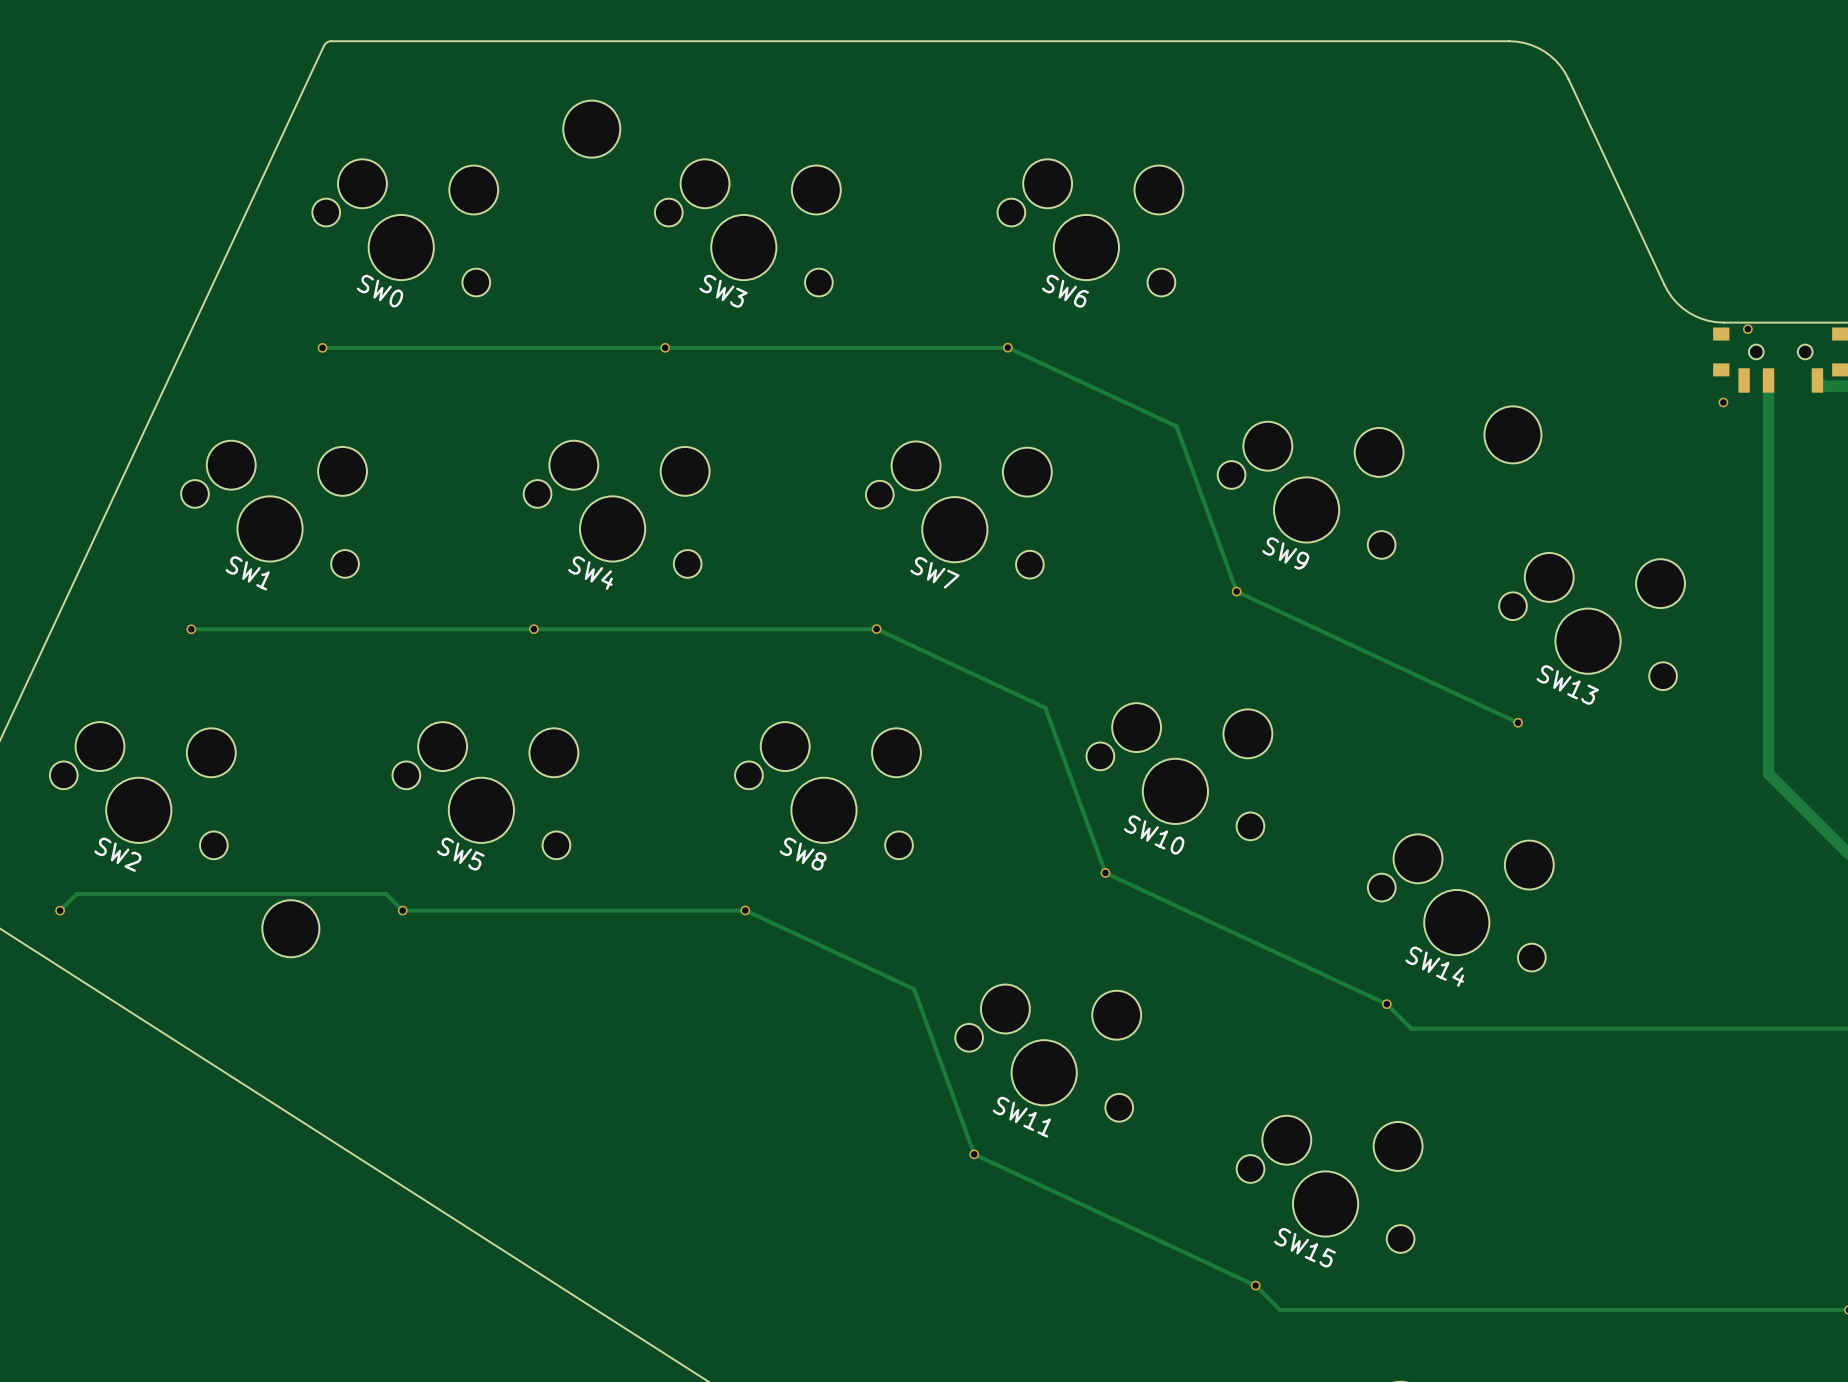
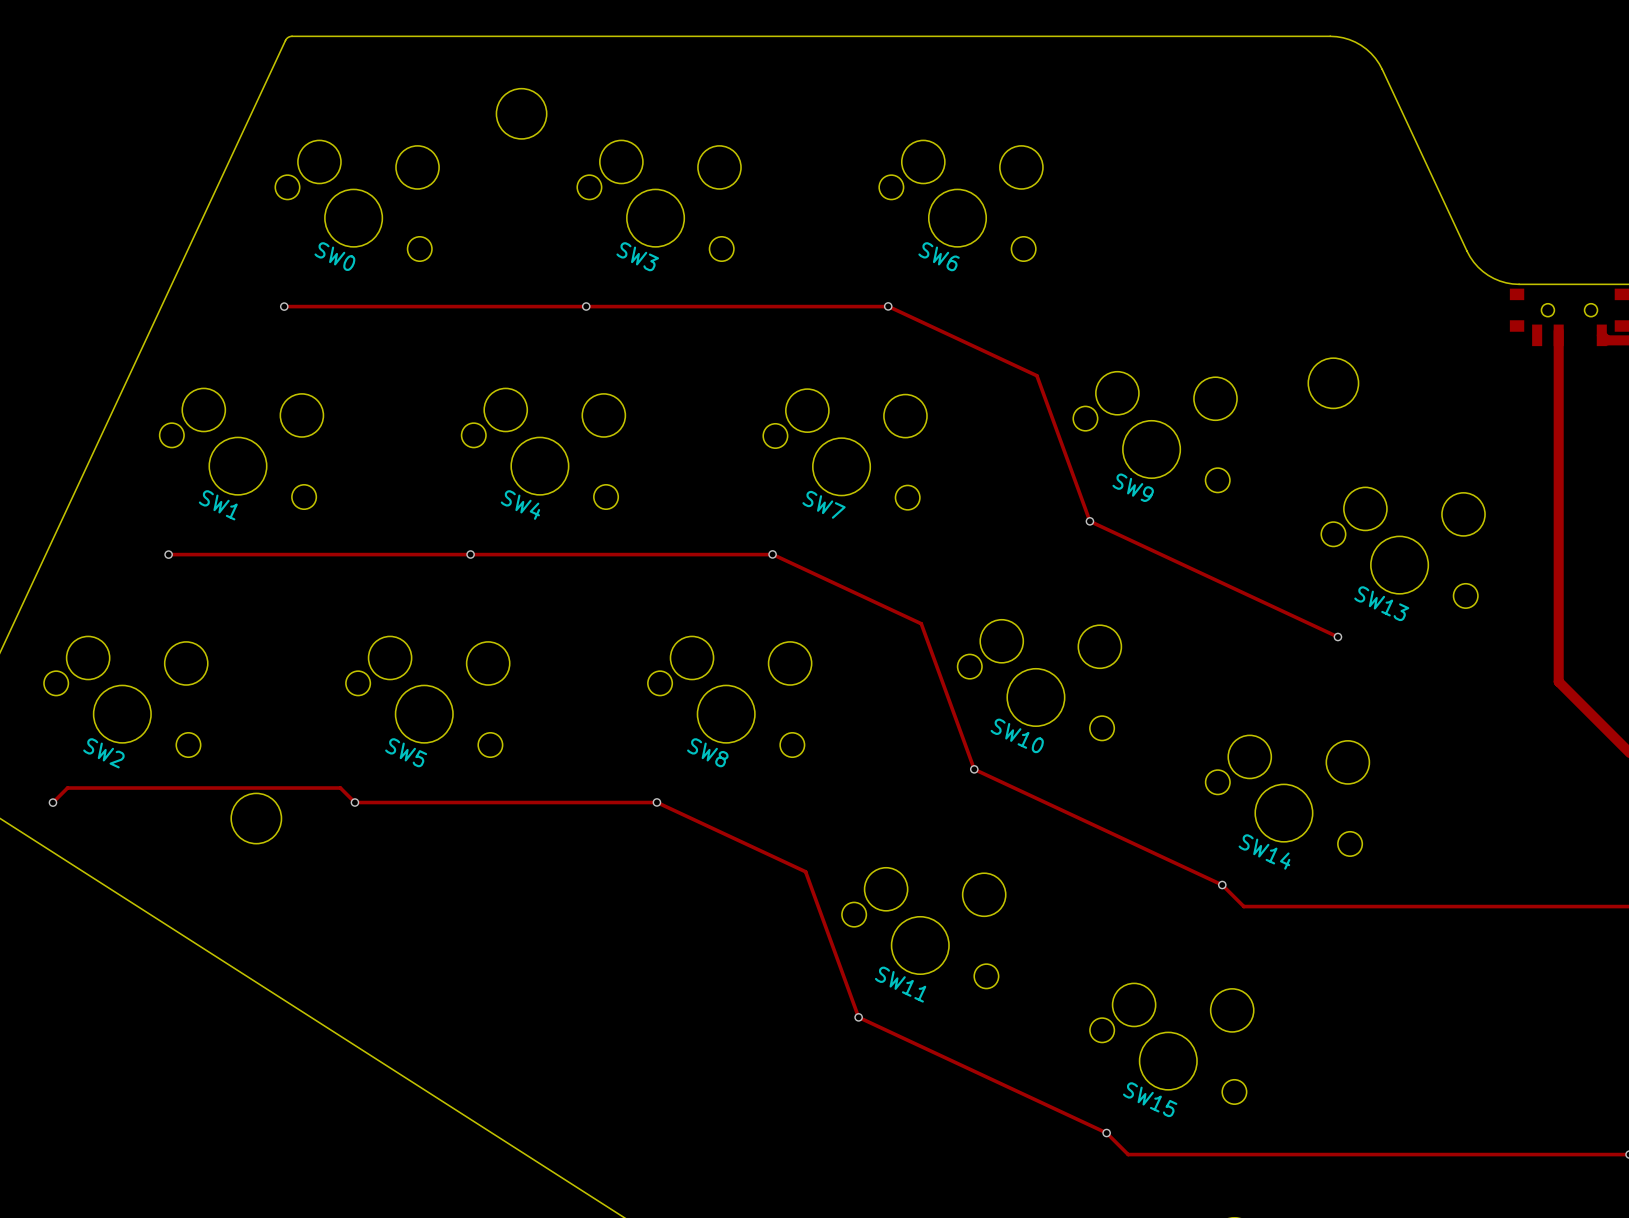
via: (1747, 329) -> none
via: (1723, 402) -> none

